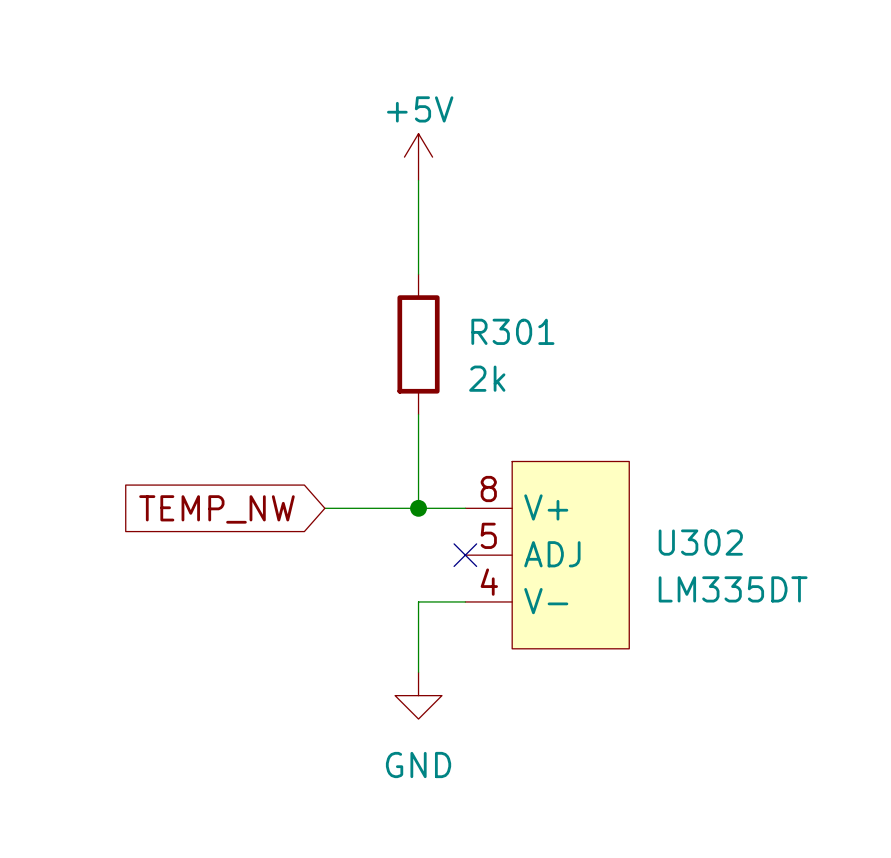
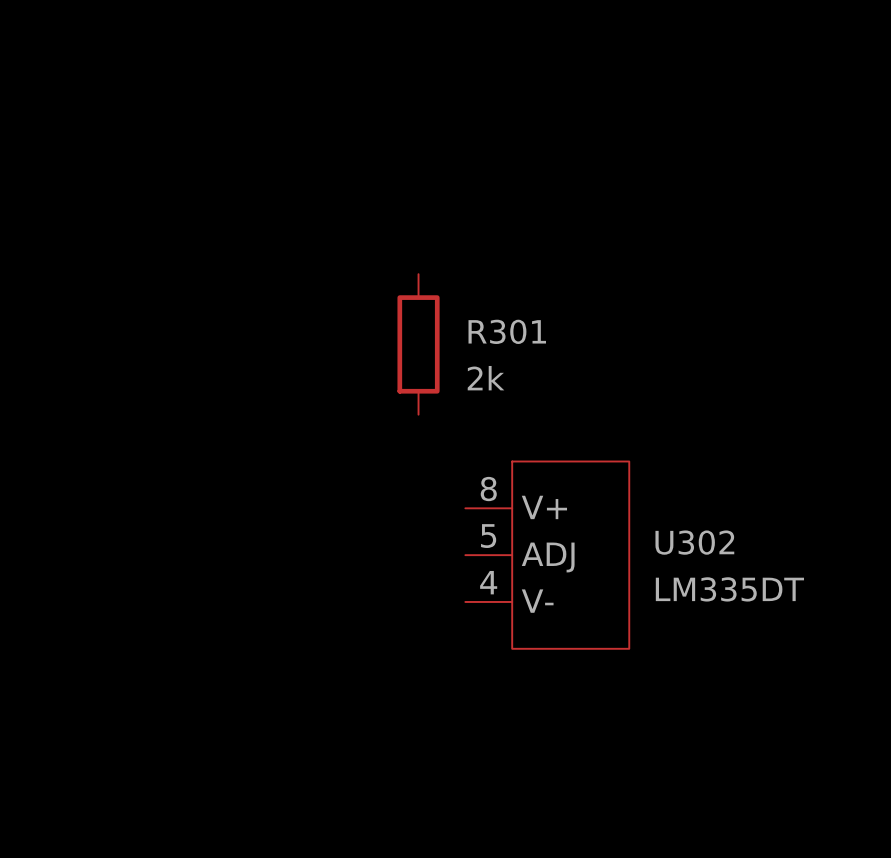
power symbol: +5V (418, 157) -> none
wire: (418, 180) (418, 274) -> none
wire: (418, 414) (418, 508) -> none
wire: (324, 508) (465, 508) -> none
junction: (418, 508) -> none
global label: TEMP_NW (216, 509) -> none
no-connect mark: (465, 555) -> none
wire: (465, 601) (418, 601) (418, 672) -> none
power symbol: GND (418, 695) -> none

